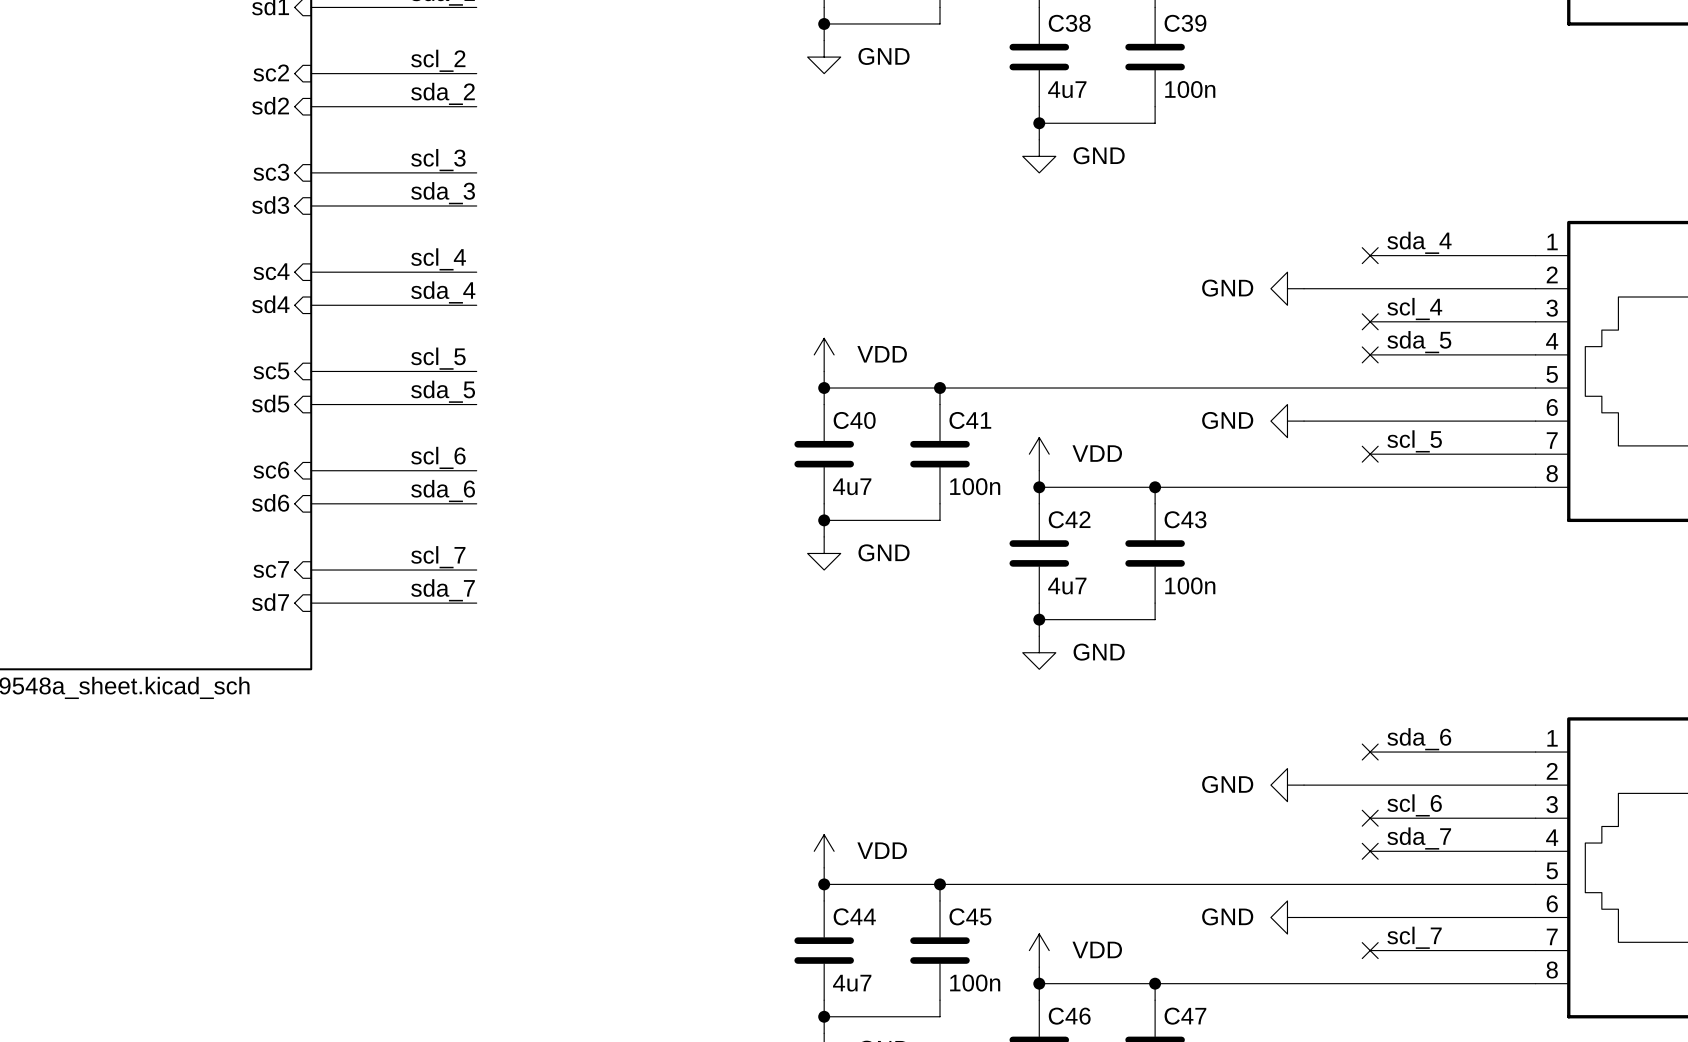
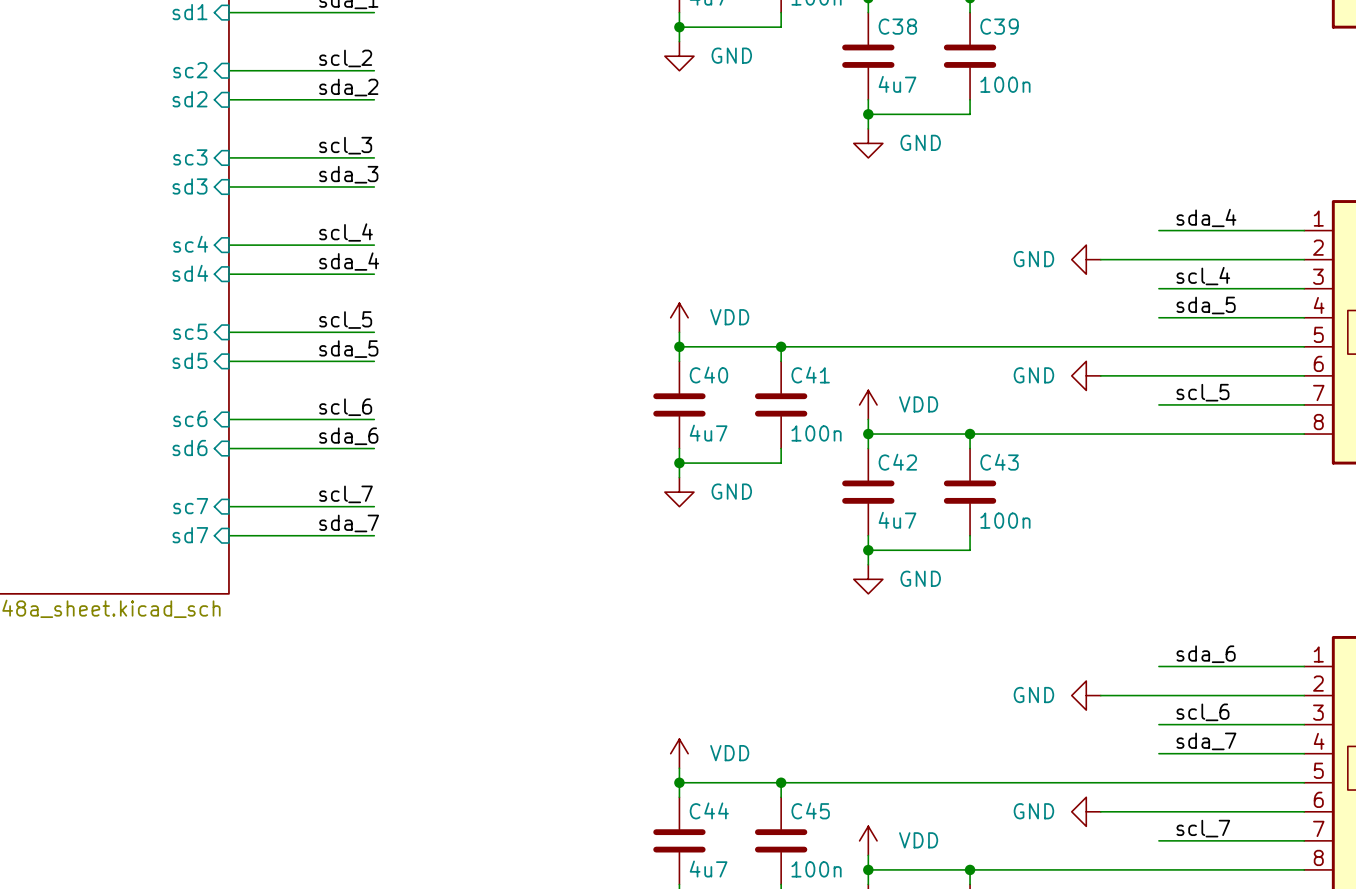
no-connect mark: (1370, 255) -> none
no-connect mark: (1370, 321) -> none
no-connect mark: (1370, 354) -> none
no-connect mark: (1370, 454) -> none
no-connect mark: (1370, 752) -> none
no-connect mark: (1370, 818) -> none
no-connect mark: (1370, 851) -> none
no-connect mark: (1370, 950) -> none

